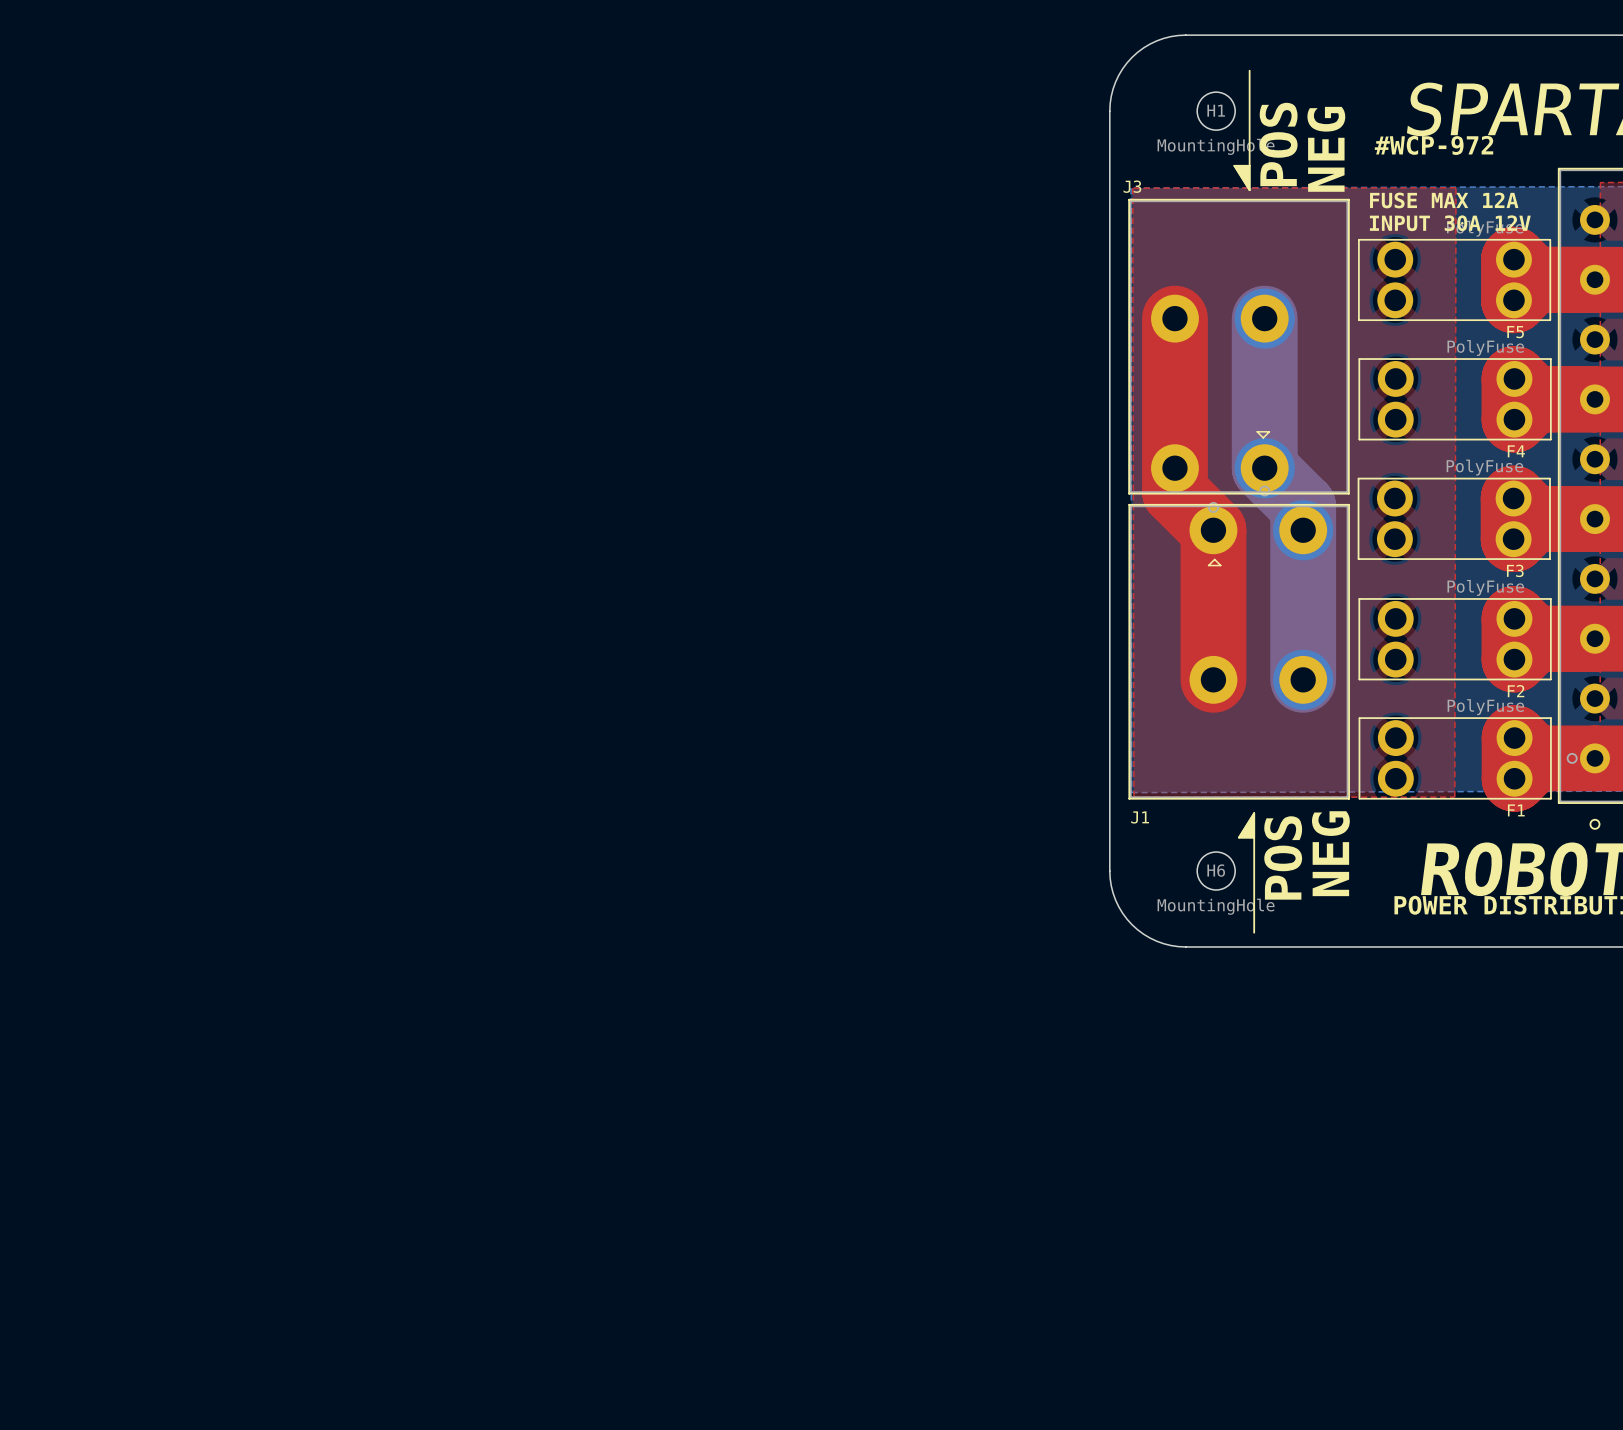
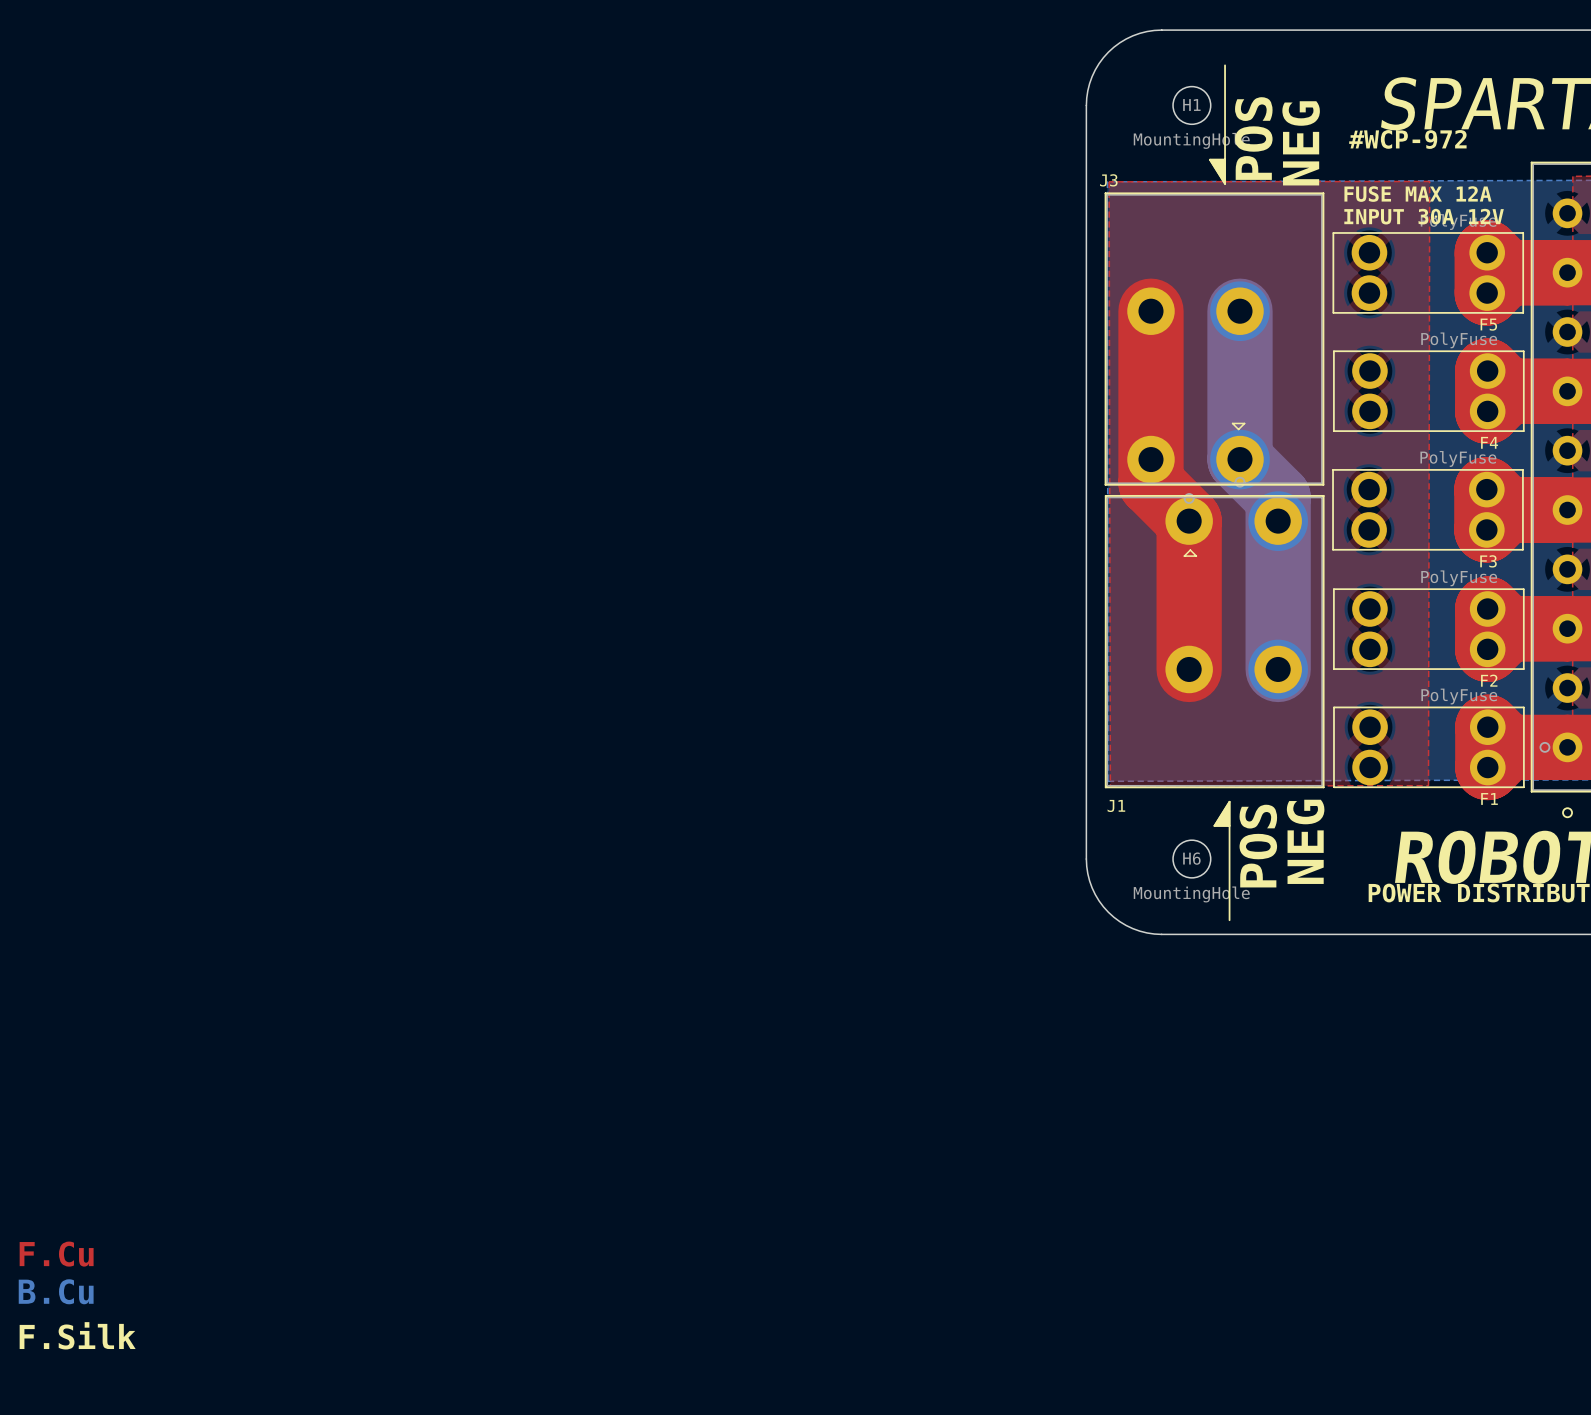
text: none -> F.Cu (56, 1254)
text: none -> B.Cu (56, 1291)
text: none -> F.Silk (77, 1335)

